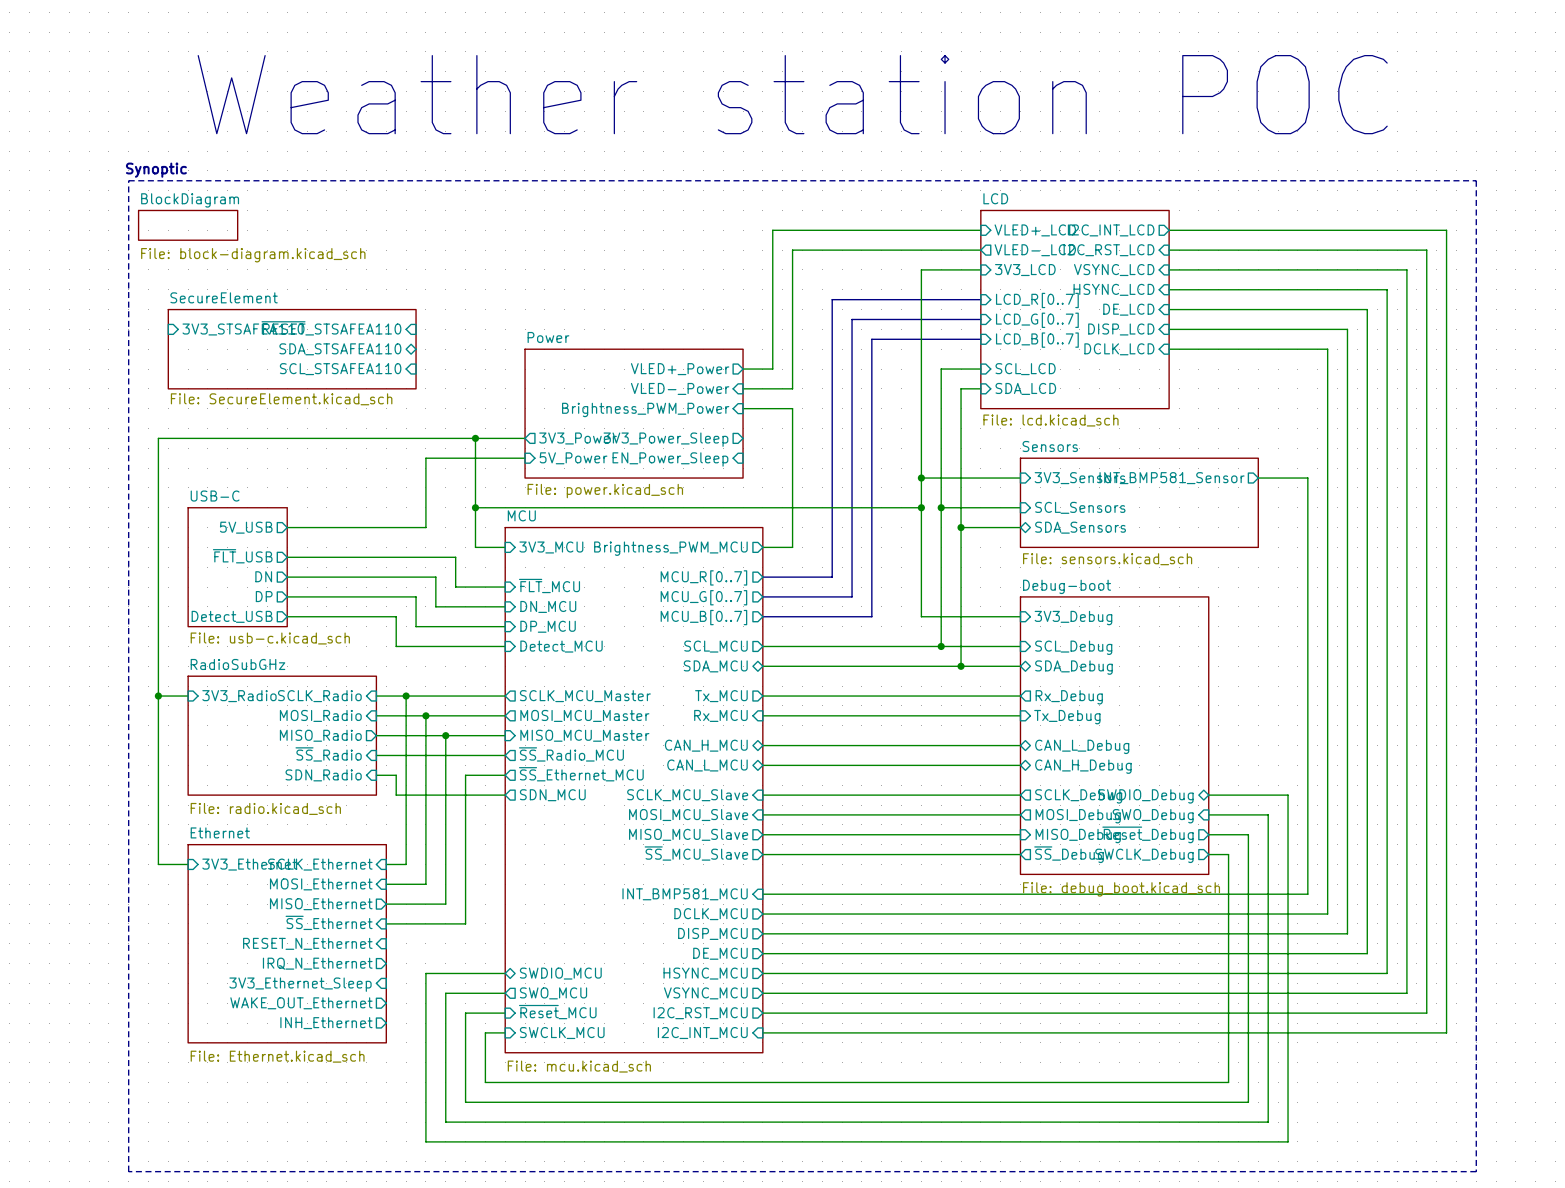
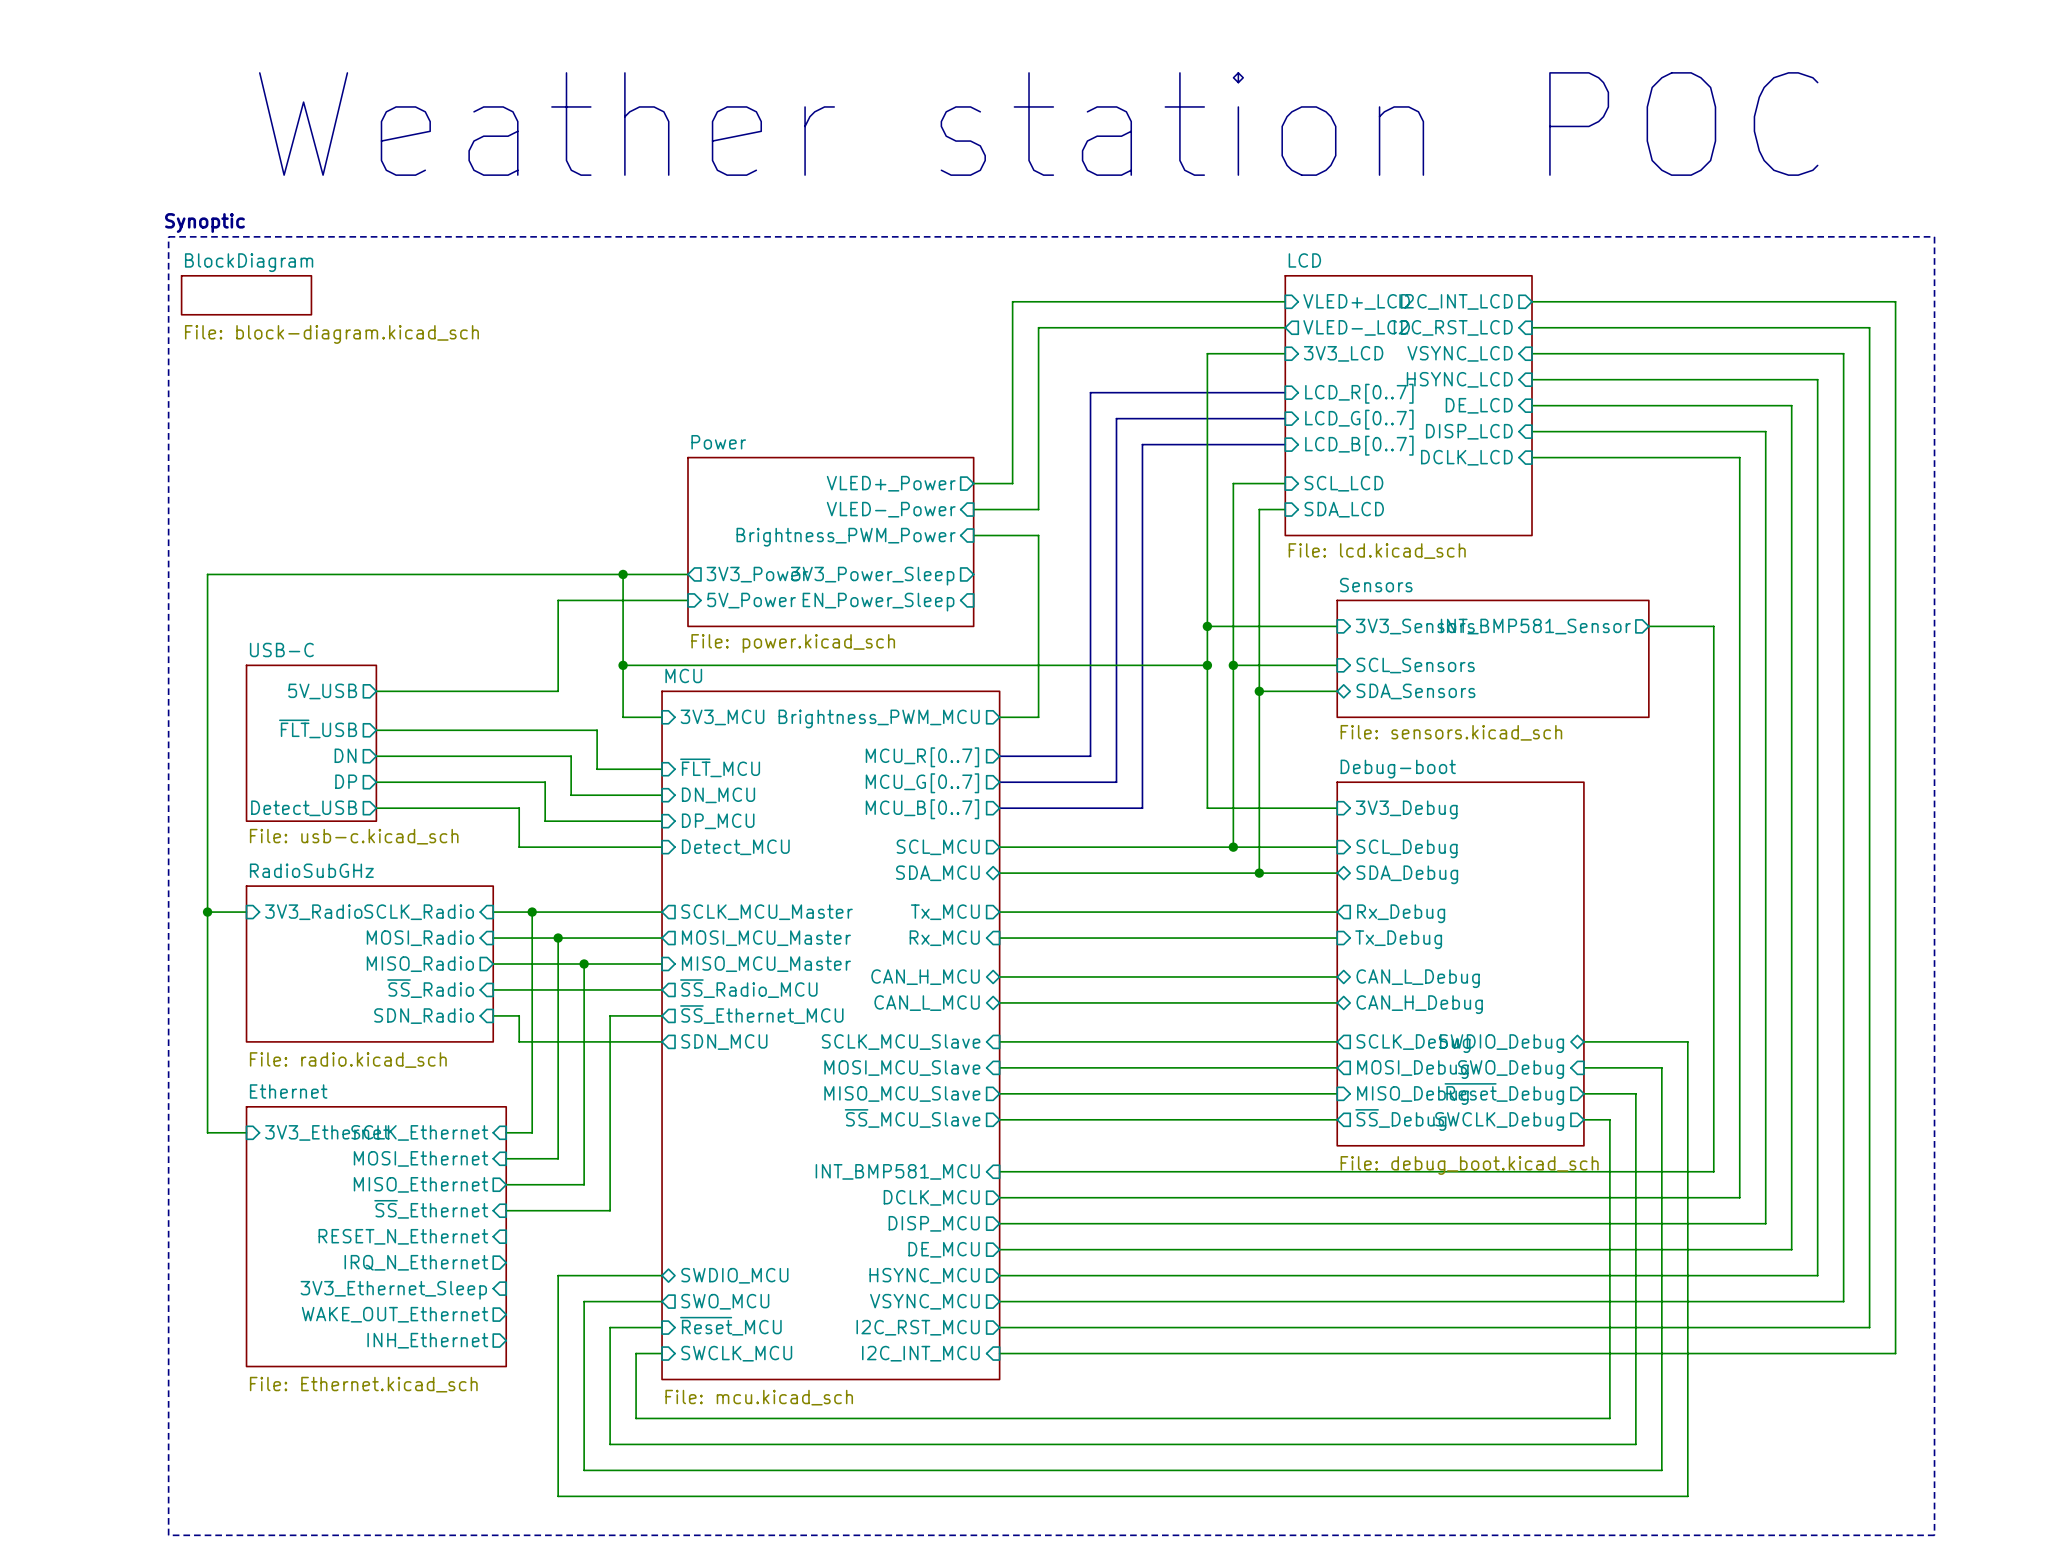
sheet pin: ~{RESET}_STSAFEA110 (331, 328) -> none
sheet pin: 3V3_STSAFEA110 (243, 329) -> none
sheet SecureElement: File: SecureElement.kicad_sch (292, 349) -> none
sheet pin: SDA_STSAFEA110 (340, 349) -> none
sheet pin: SCL_STSAFEA110 (340, 369) -> none

